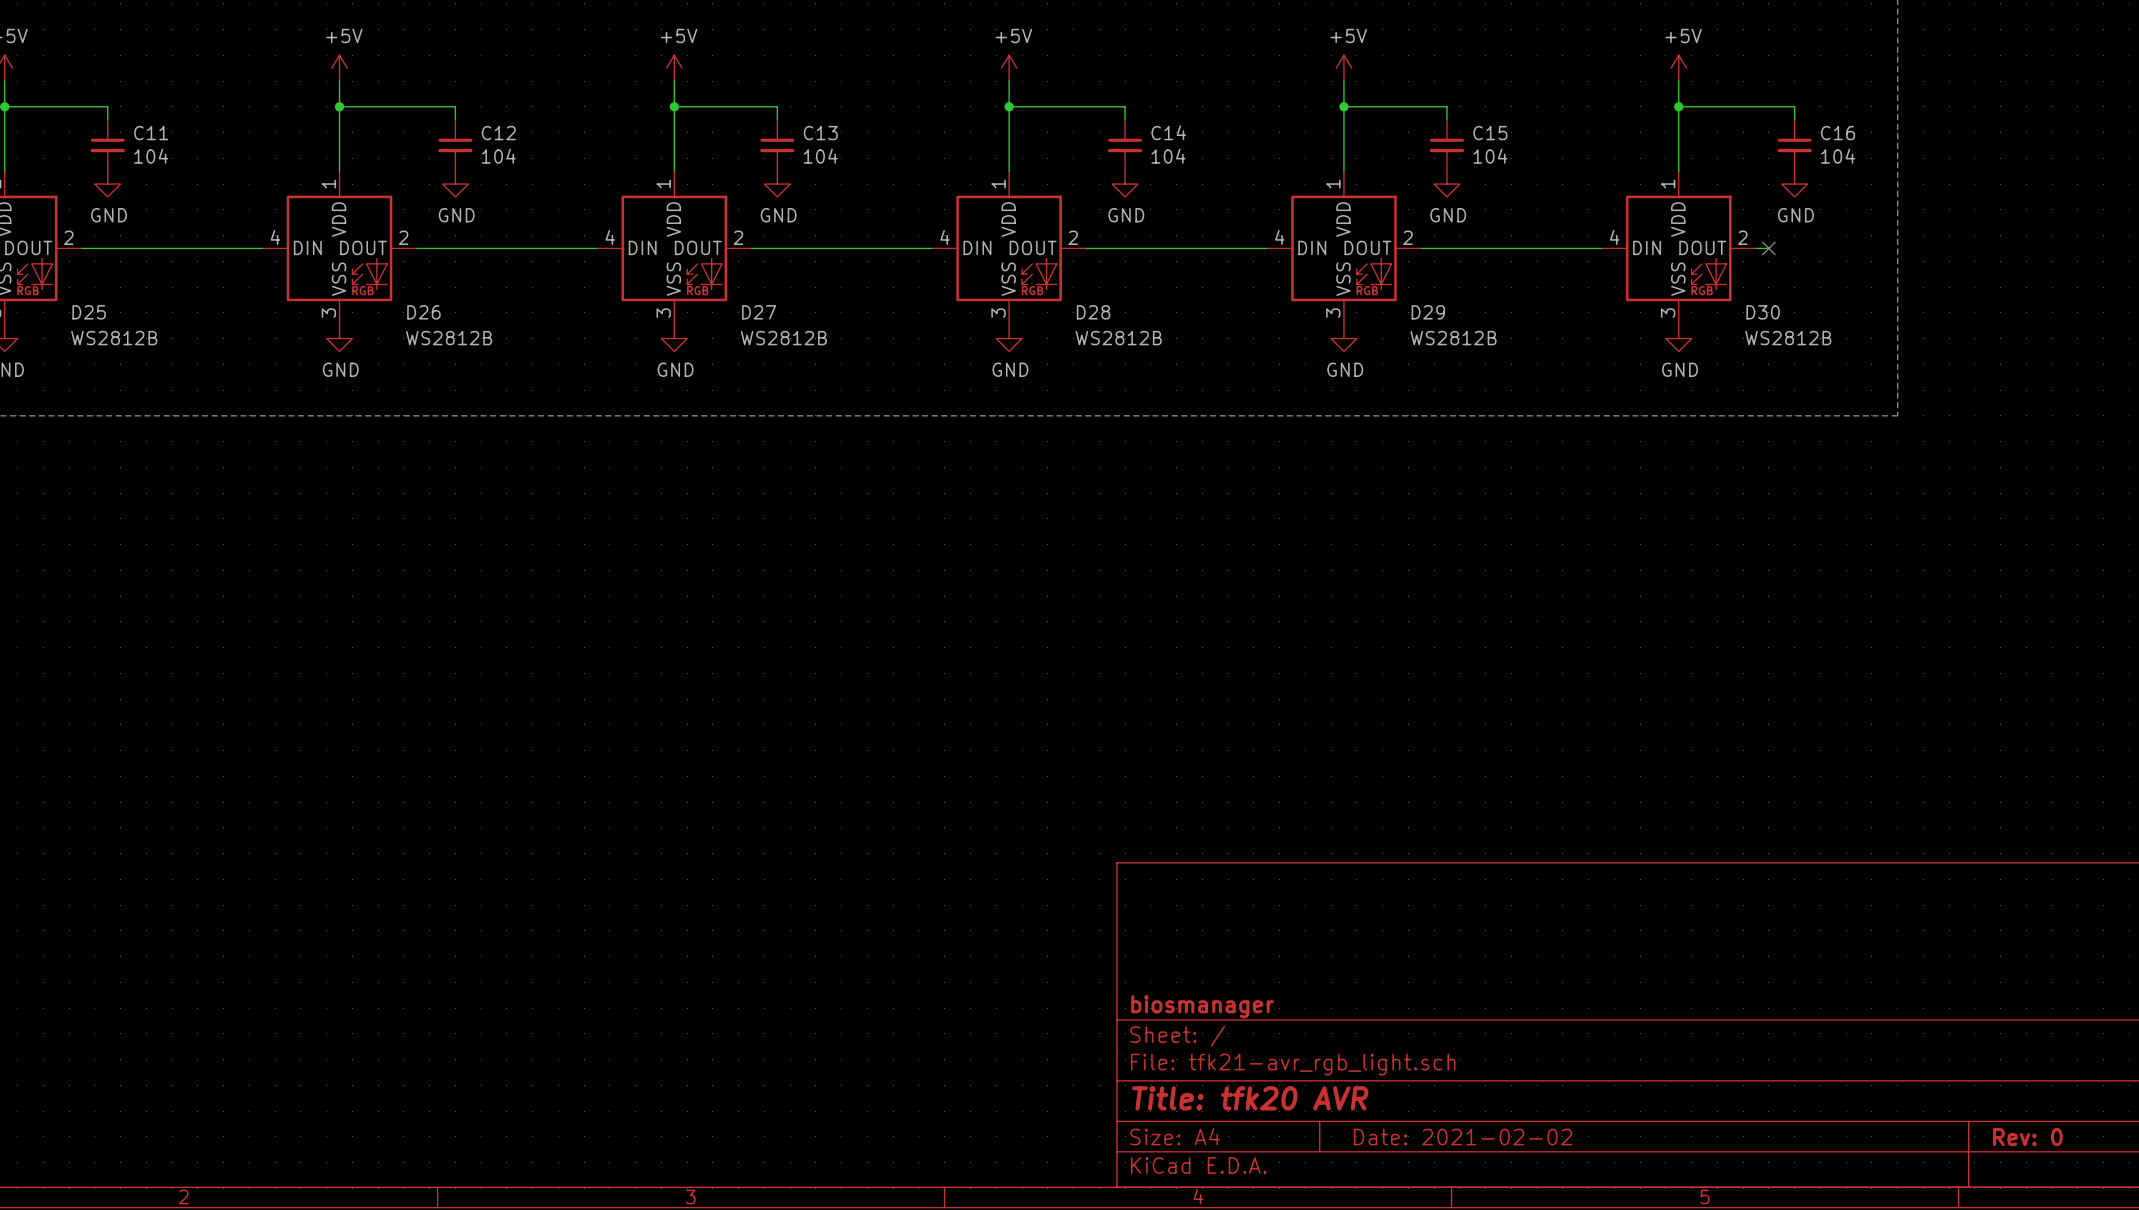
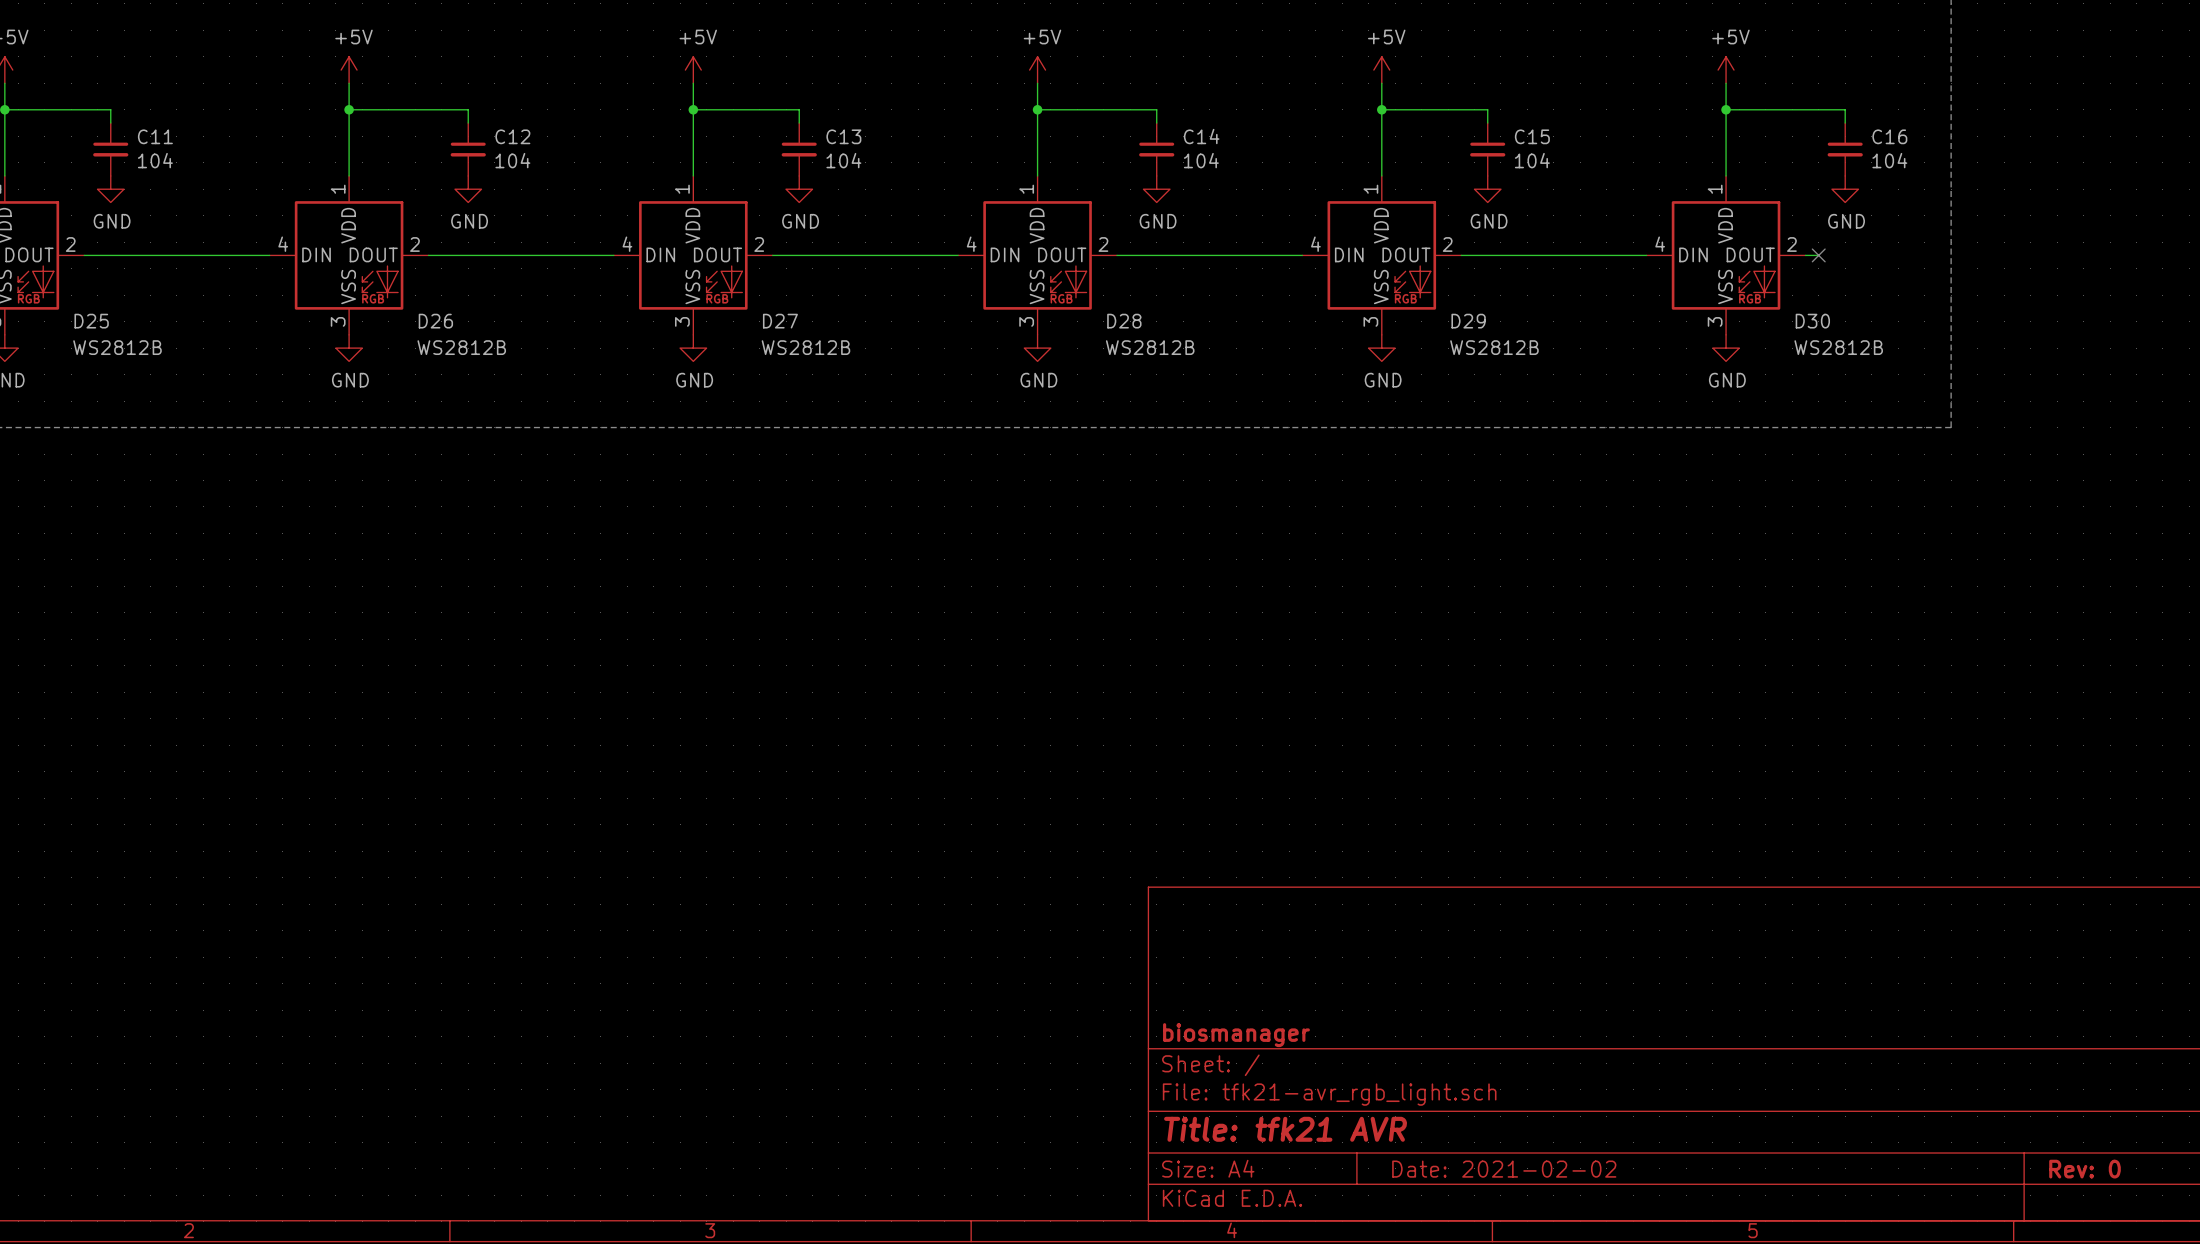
title block: Title: tfk20 AVR (1250, 1098) -> Title: tfk21 AVR (1285, 1129)

